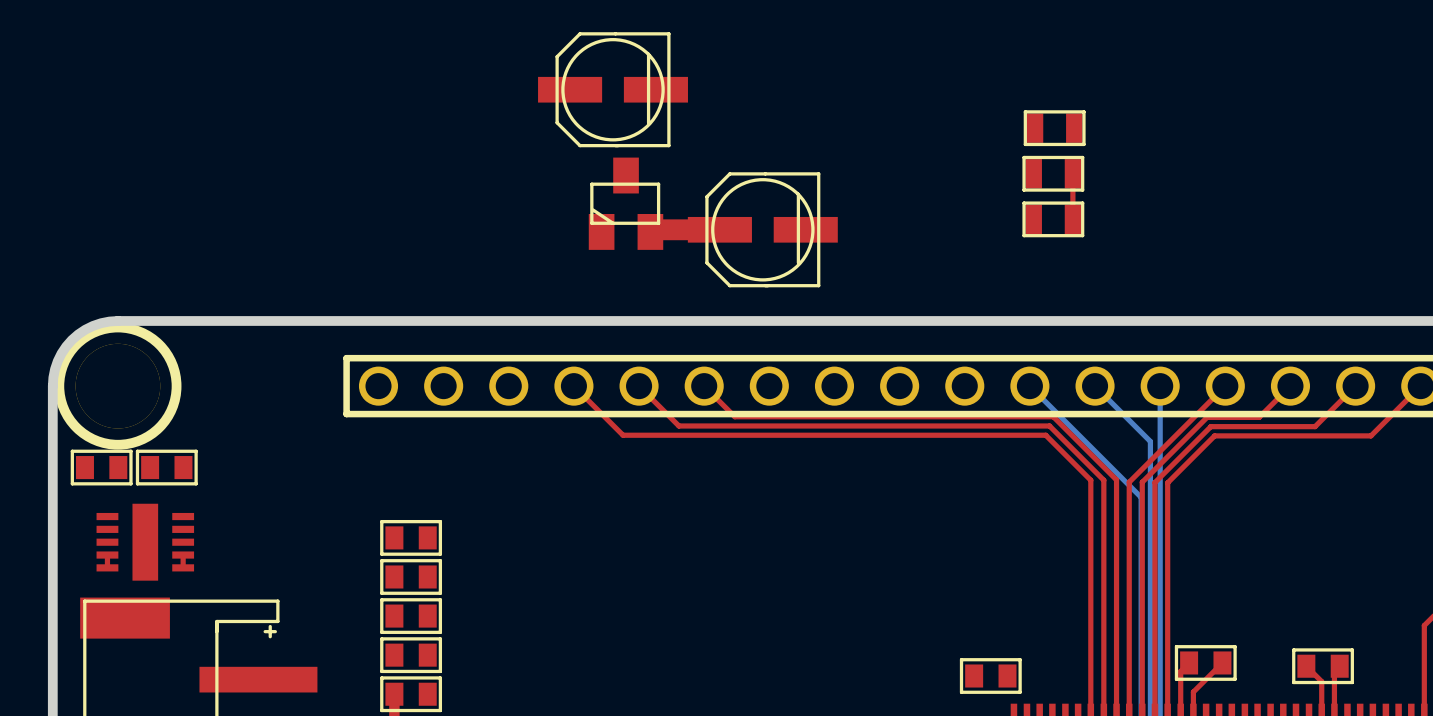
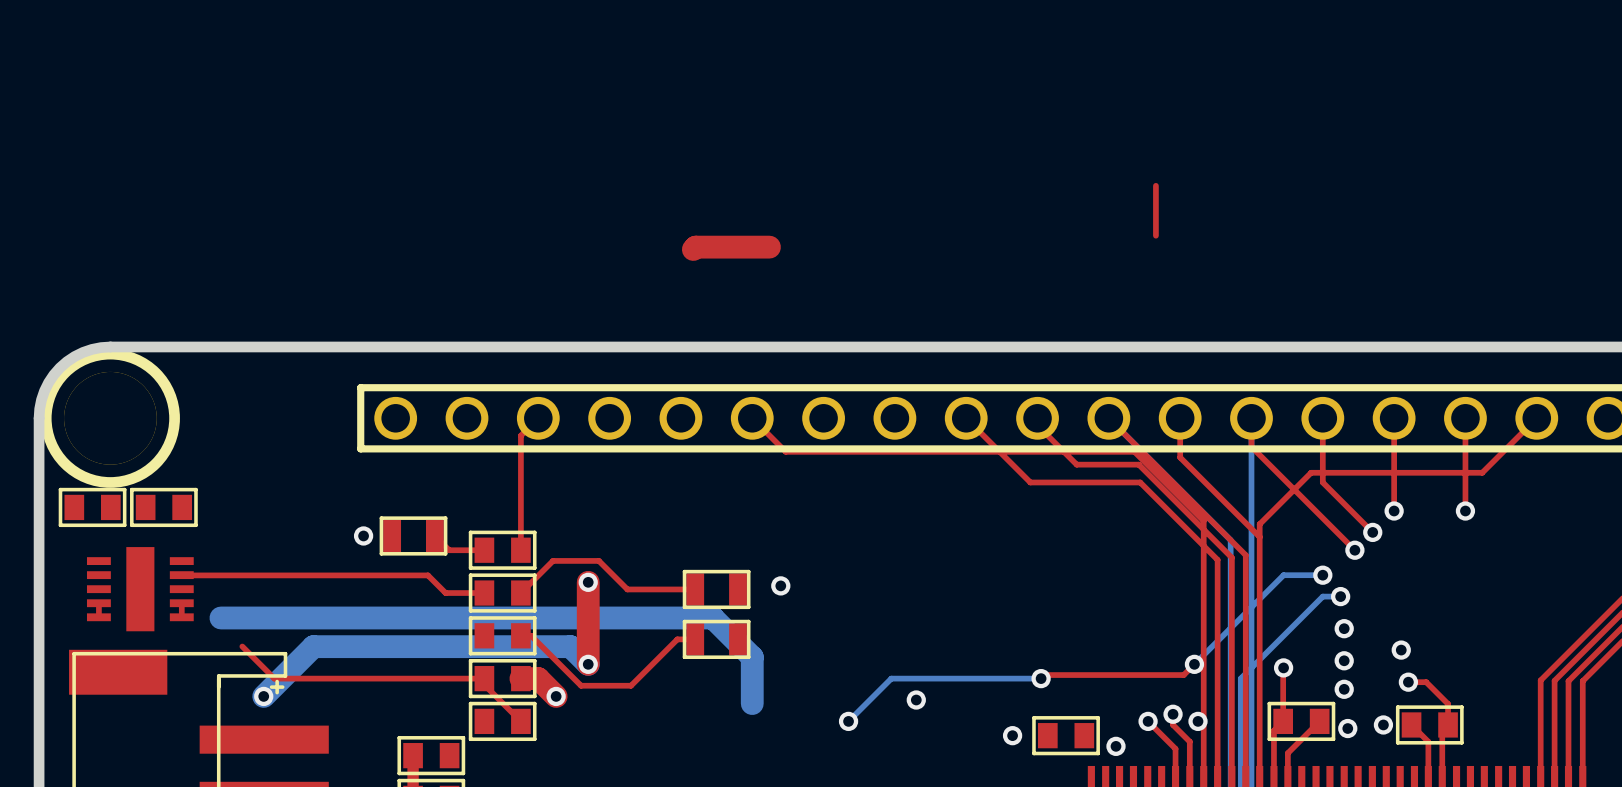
part: (613, 89) -> none
part: (1054, 128) -> none
part: (1053, 173) -> none
part: (626, 203) -> none
part: (1053, 219) -> none
part: (762, 229) -> none
top track: none -> (538, 418) (520, 435) (520, 550)
top track: (573, 386) (623, 435) (1045, 435) (1090, 480) (1090, 688) -> (1148, 721) (1175, 748)
top track: (639, 386) (678, 425) (1049, 425) (1103, 480) (1103, 681) -> (1173, 714) (1173, 724) (1189, 741)
top track: none -> (966, 418) (1030, 482) (1140, 482) (1217, 559)
top track: none -> (1108, 418) (1245, 555)
top track: none -> (1180, 418) (1180, 457) (1259, 537)
bottom track: (1095, 386) (1150, 441) (1150, 623) -> (1340, 596) (1322, 596) (1240, 678)
top track: none -> (1251, 418) (1251, 446) (1354, 550)
top track: (1225, 386) (1129, 482) (1129, 515) -> (1322, 418) (1322, 482) (1372, 532)
top track: (1290, 386) (1259, 417) (1207, 417) (1142, 482) (1142, 513) -> (1394, 418) (1394, 511)
top track: (1355, 386) (1315, 426) (1210, 426) (1154, 482) (1154, 511) -> (1465, 418) (1465, 511)
top track: none -> (1037, 421) (1037, 425) (1076, 464) (1138, 464) (1231, 557)
via: none -> (1394, 511)
via: none -> (1465, 511)
via: none -> (1372, 532)
via: none -> (363, 535)
part: none -> (413, 535)
top track: none -> (434, 535) (449, 550) (484, 550)
part: none -> (502, 550)
via: none -> (1354, 550)
top track: none -> (180, 575) (427, 575) (445, 593) (484, 593)
bottom track: none -> (1322, 575) (1283, 575) (1194, 664)
via: none -> (1322, 575)
top track: none -> (588, 582) (588, 664)
via: none -> (588, 582)
part: (411, 537) -> none
via: none -> (780, 585)
top track: none -> (695, 589) (627, 589) (598, 560) (553, 560) (520, 593)
part: none -> (716, 589)
part: none -> (502, 593)
via: none -> (1340, 596)
bottom track: none -> (220, 617) (713, 617) (752, 657) (752, 703)
part: (411, 576) -> none
via: none -> (1344, 628)
part: none -> (502, 635)
top track: none -> (520, 635) (531, 635) (581, 685) (631, 685) (677, 639) (695, 639)
part: none -> (716, 639)
top track: none -> (242, 646) (274, 678) (484, 678) (484, 684) (520, 721)
via: none -> (1401, 650)
via: none -> (1344, 660)
bottom track: none -> (588, 664) (570, 646) (313, 646) (263, 696)
via: none -> (588, 664)
top track: none -> (1194, 664) (1183, 675) (1044, 675) (1041, 678)
via: none -> (1194, 664)
top track: none -> (1283, 667) (1283, 721)
via: none -> (1283, 667)
part: (411, 616) -> none
part: none -> (502, 678)
top track: none -> (520, 678) (538, 678) (556, 696)
bottom track: none -> (1041, 678) (891, 678) (848, 721)
via: none -> (1041, 678)
top track: none -> (1408, 682) (1426, 682) (1448, 704) (1448, 724)
via: none -> (1408, 682)
via: none -> (1344, 689)
via: none -> (263, 696)
via: none -> (556, 696)
via: none -> (916, 700)
part: (411, 655) -> none
via: none -> (1173, 714)
part: none -> (502, 721)
via: none -> (848, 721)
via: none -> (1148, 721)
via: none -> (1198, 721)
via: none -> (1383, 724)
via: none -> (1347, 728)
via: none -> (1012, 735)
via: none -> (1115, 746)

